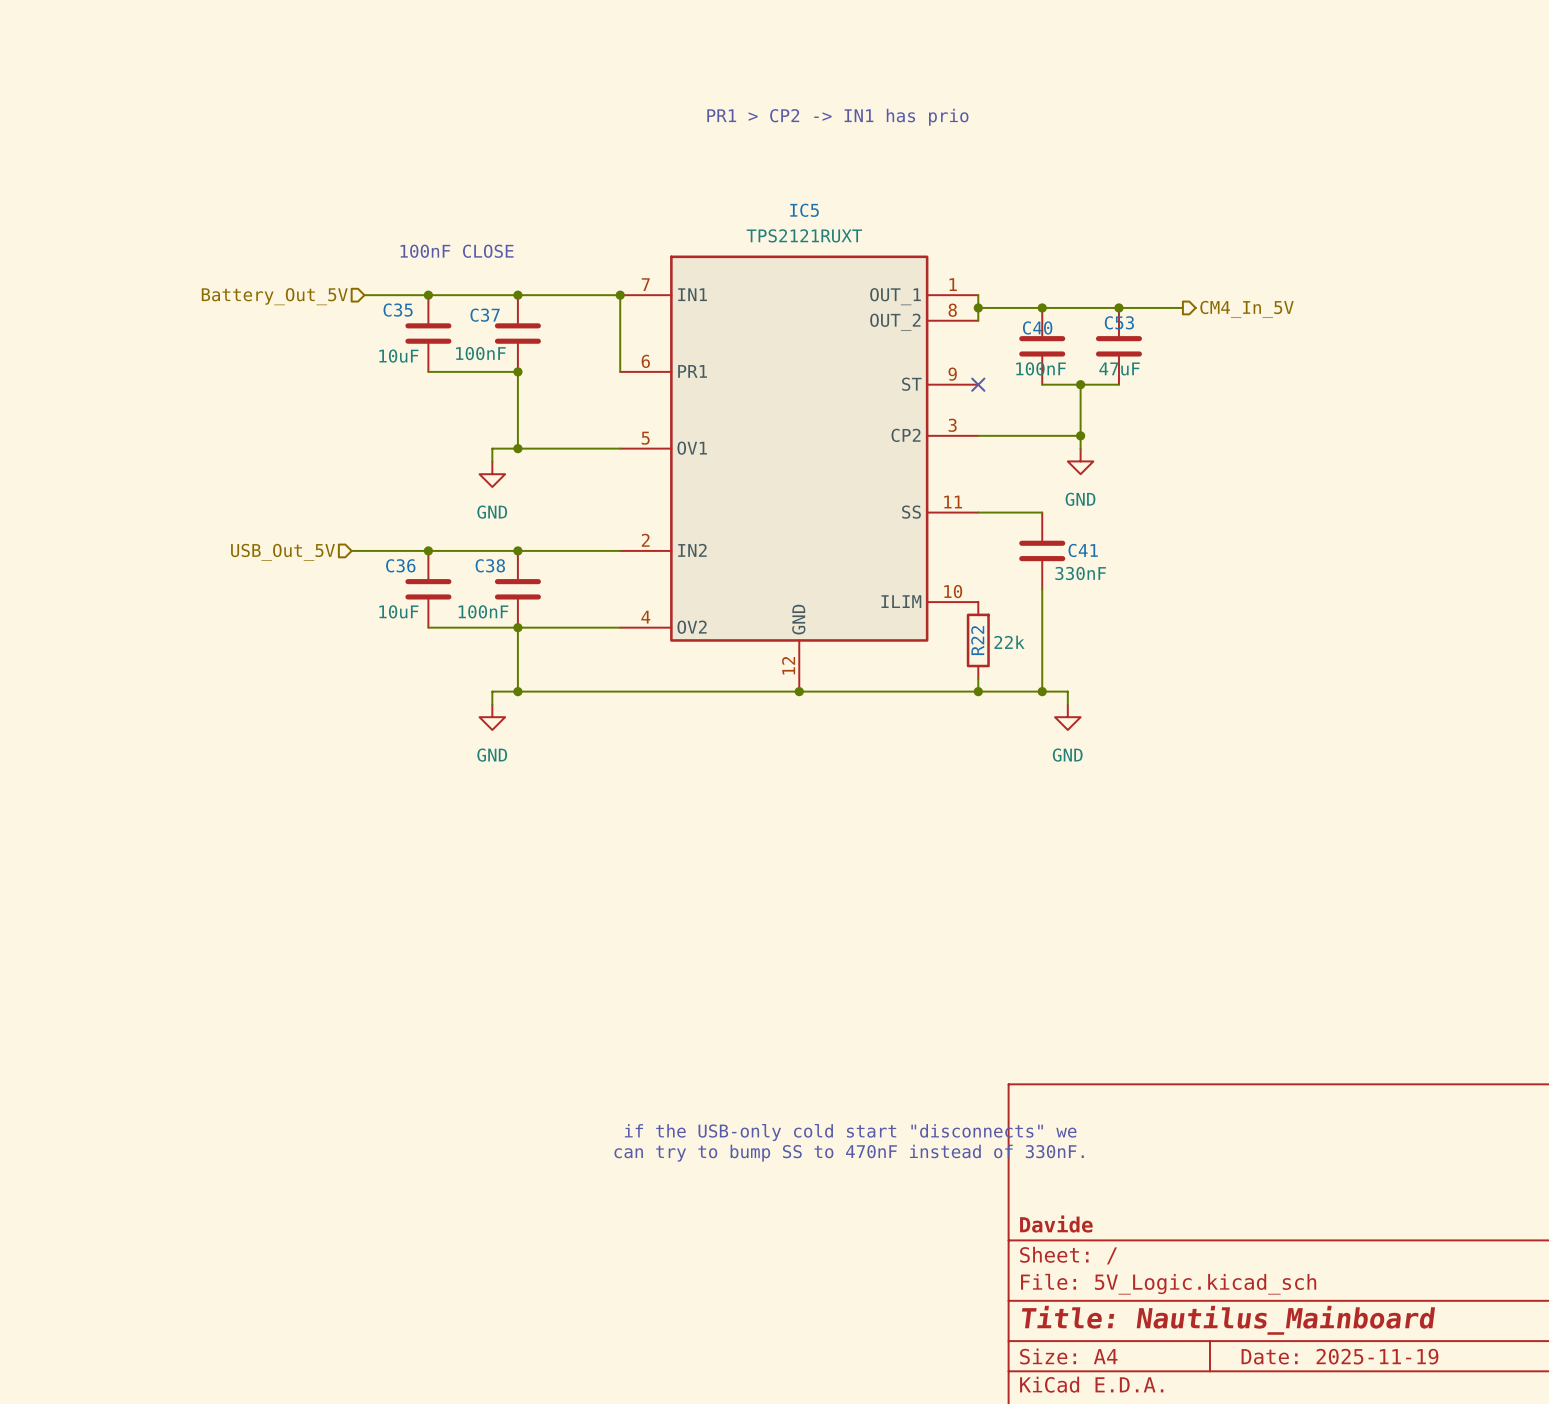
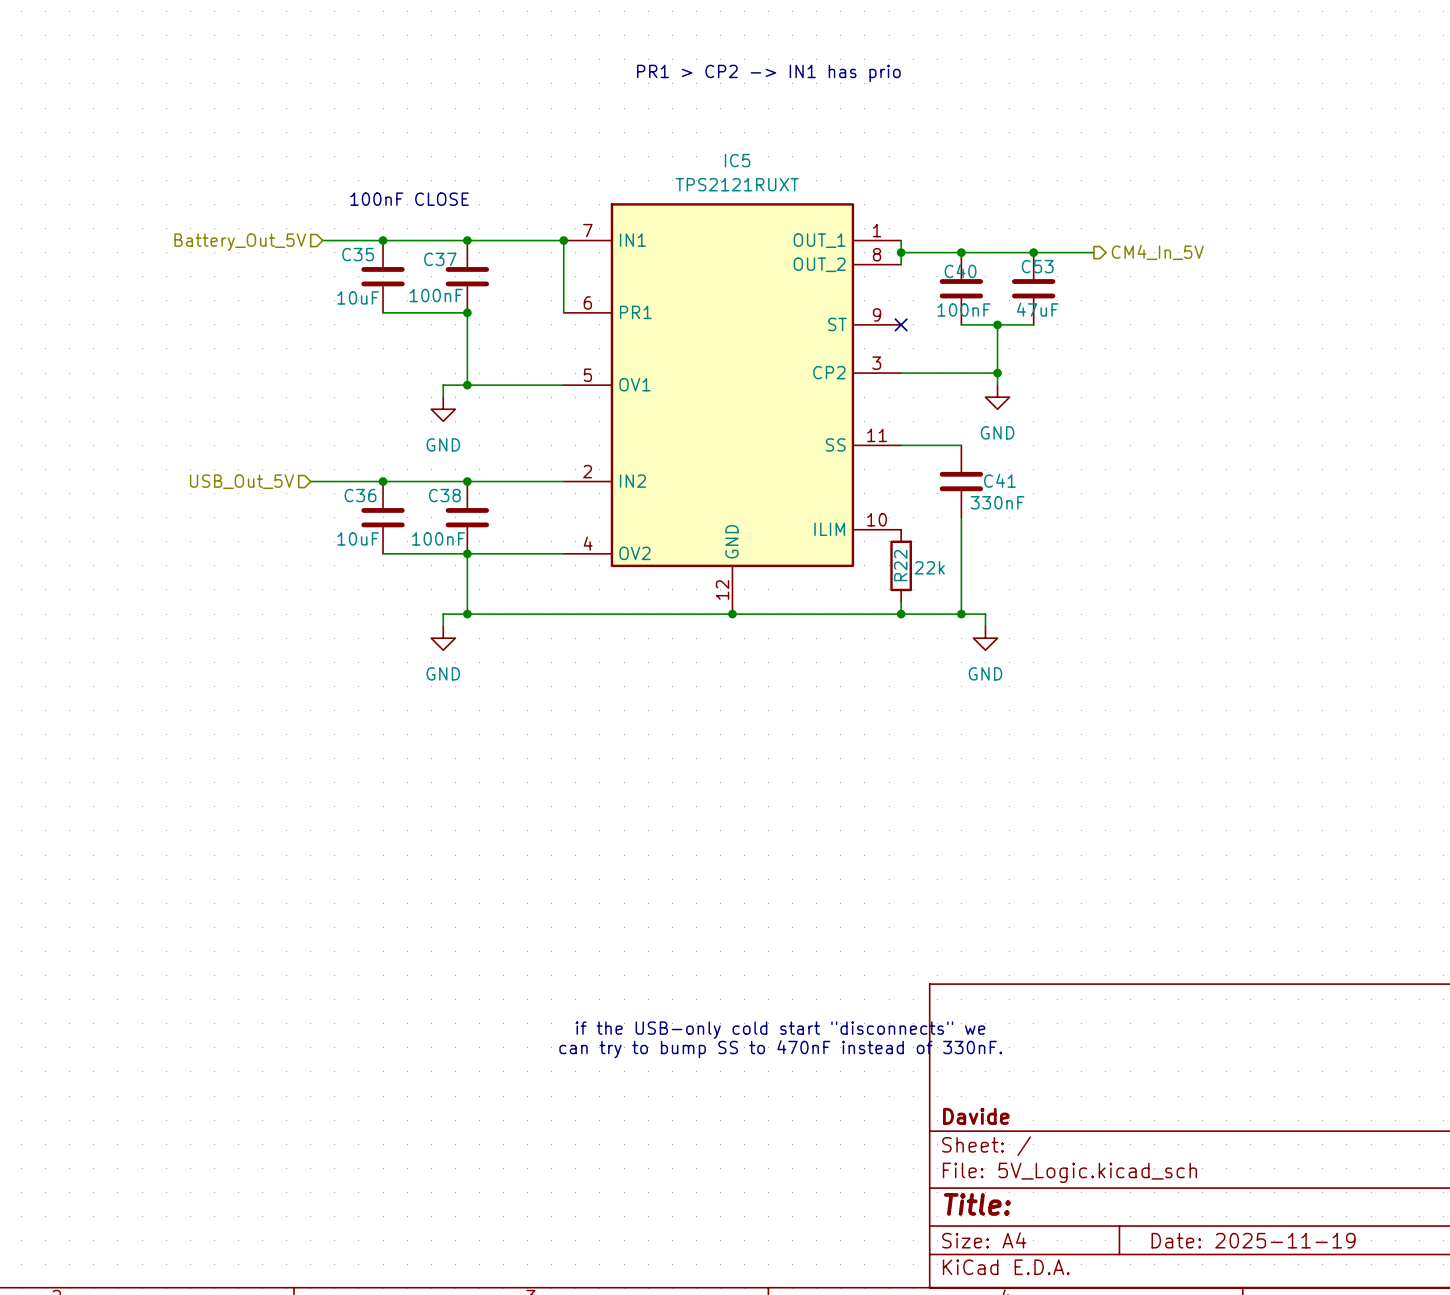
title block: Title: Nautilus_Mainboard (1228, 1320) -> Title: (977, 1204)

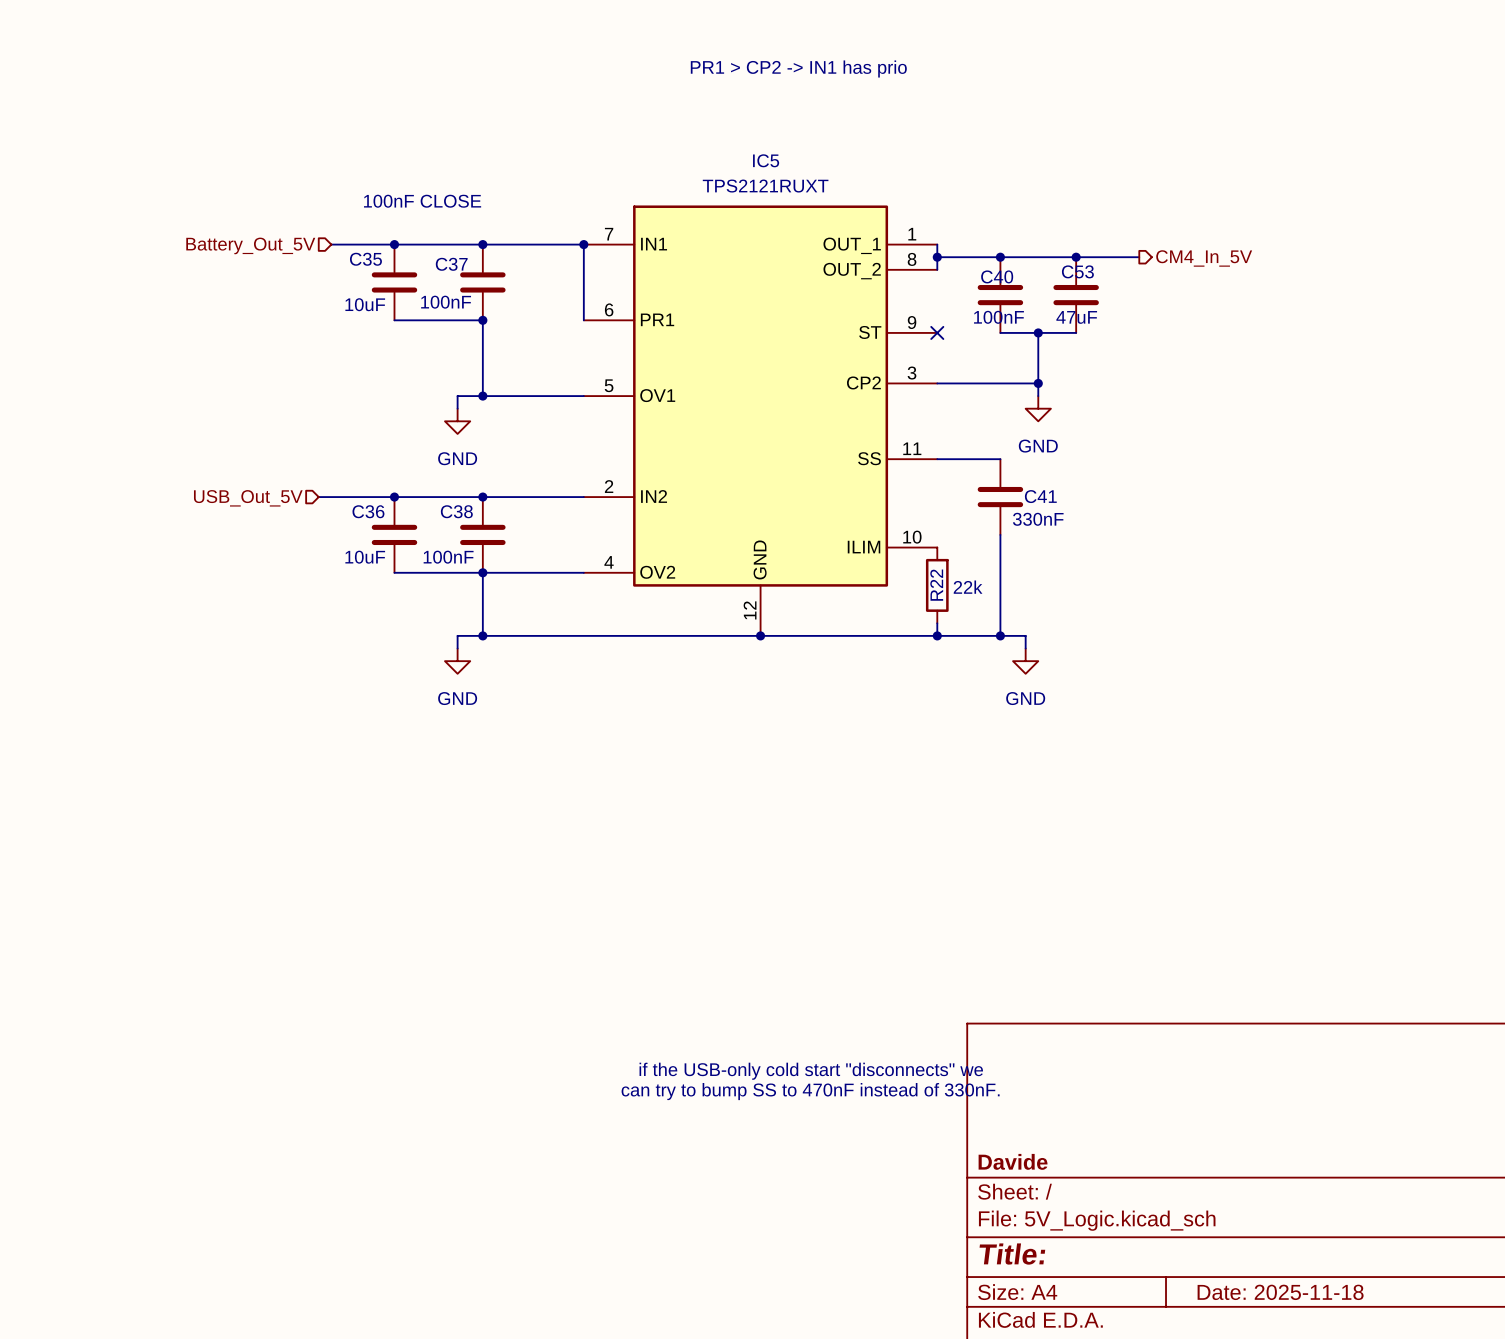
title block: Date: 2025-11-19 (1253, 1240) -> Date: 2025-11-18 (1280, 1292)

